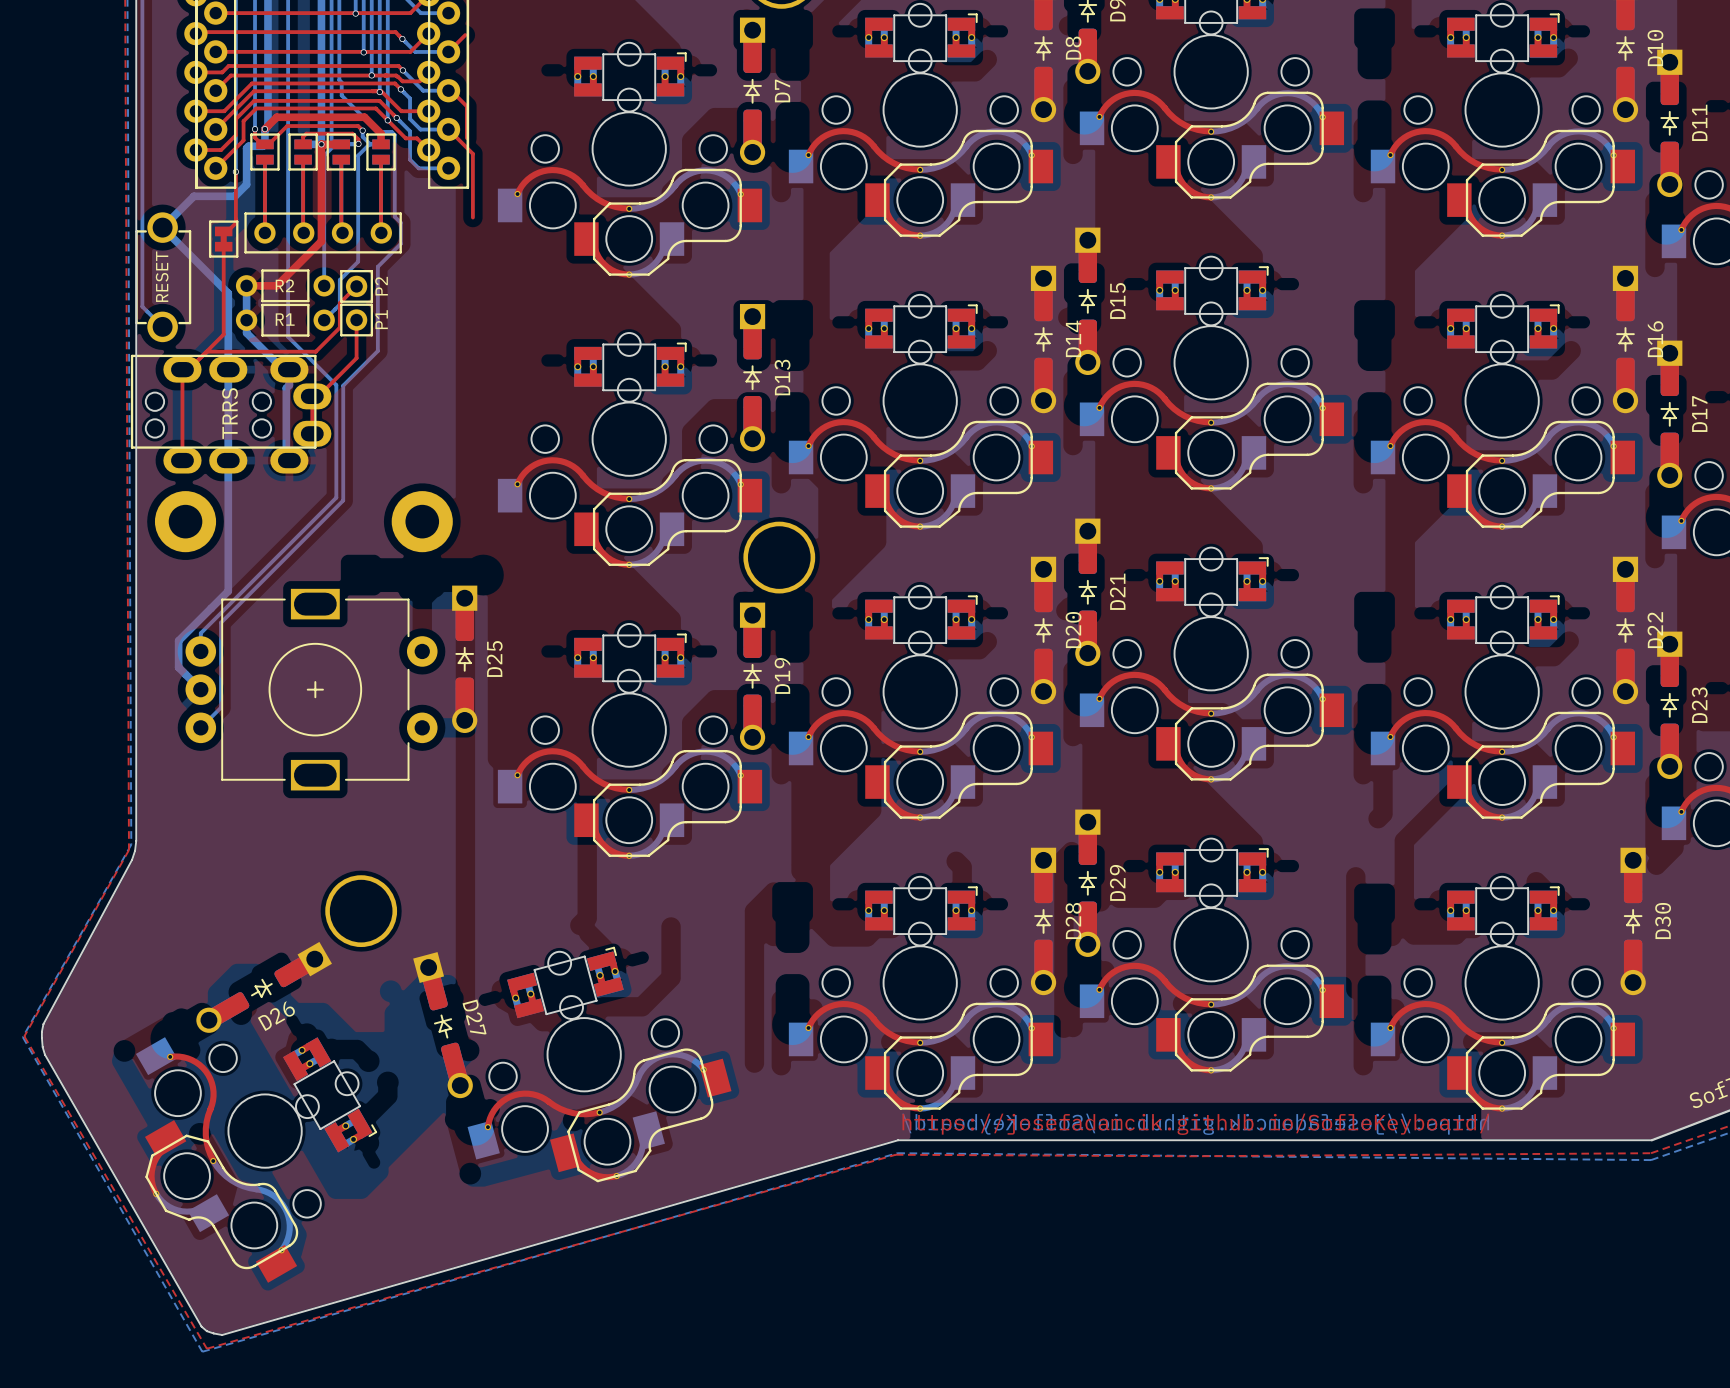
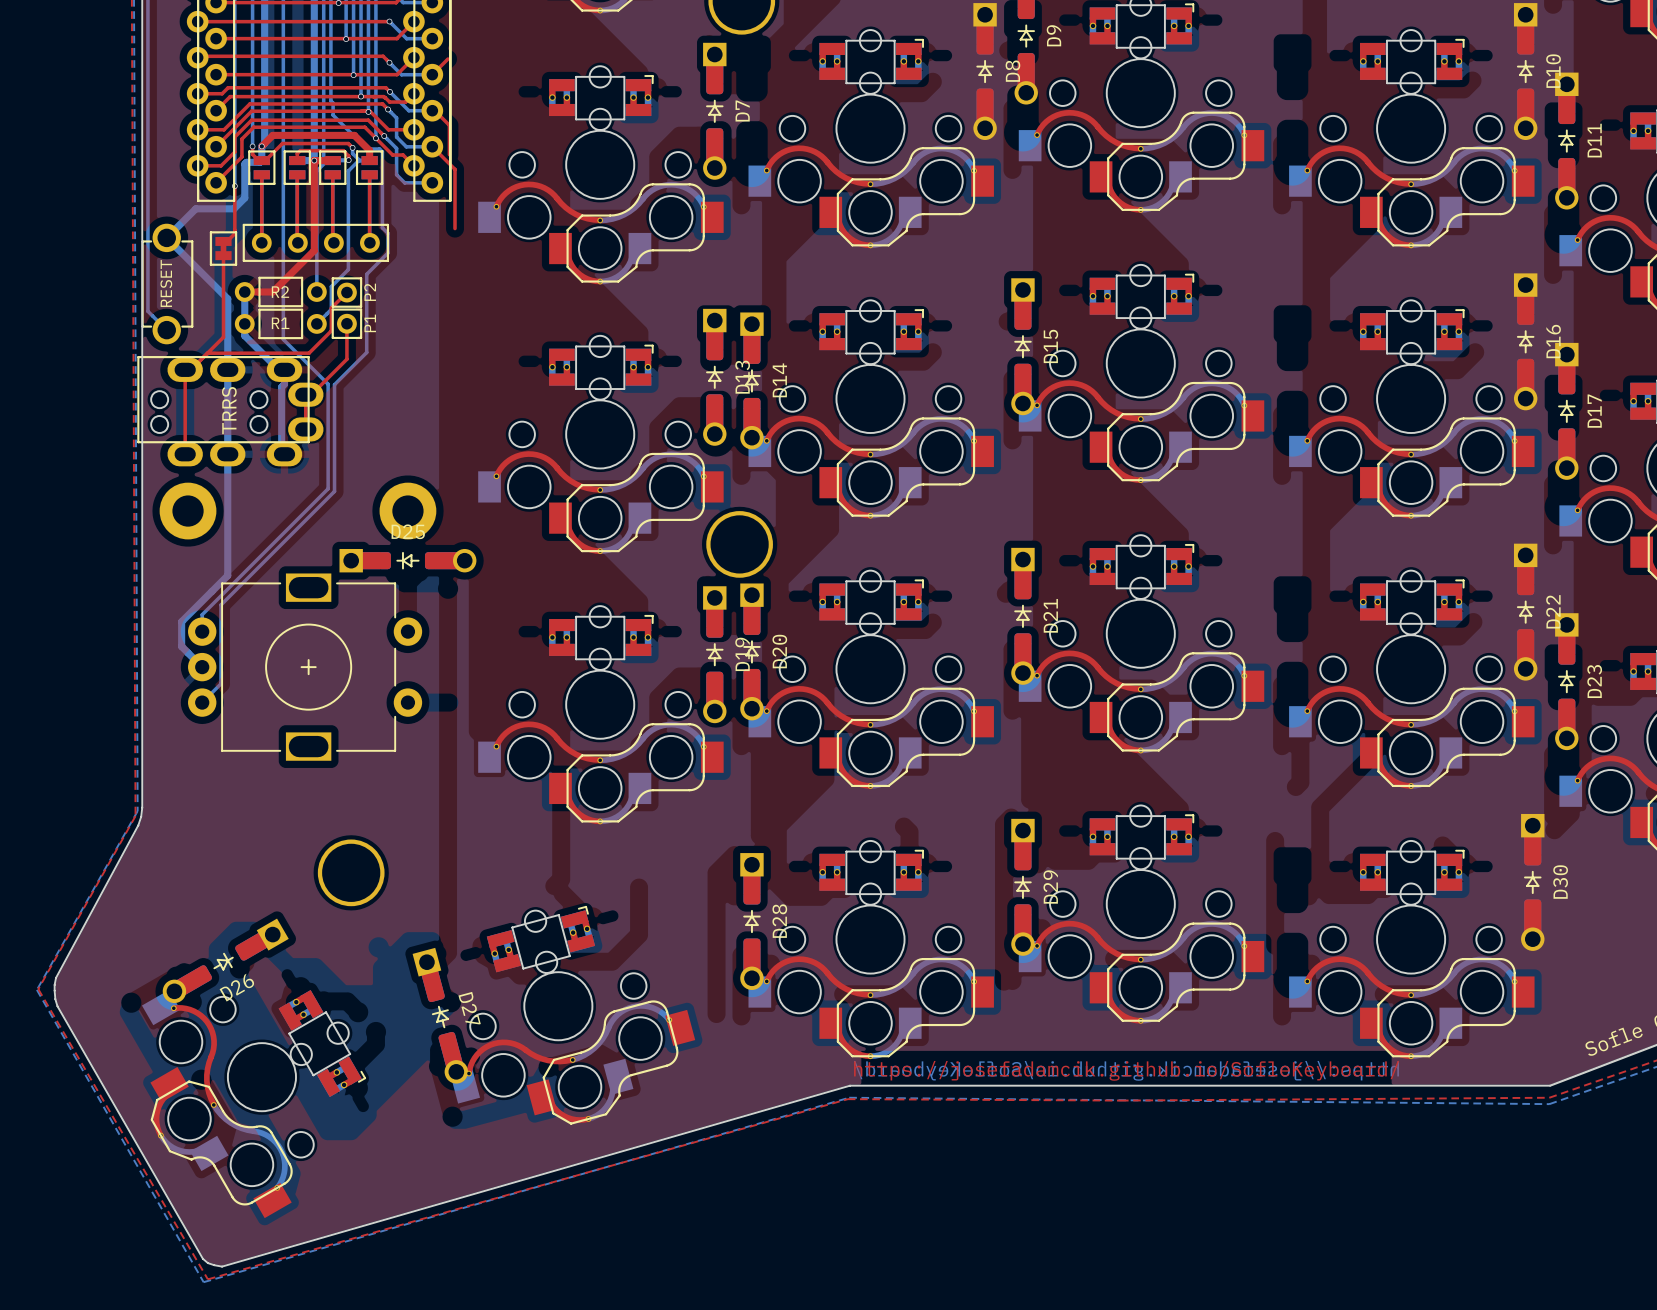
D15 position: (1087, 301) -> (1022, 346)
D14 position: (1043, 339) -> (751, 380)
D21 position: (1087, 592) -> (1022, 616)
D20 position: (1043, 630) -> (751, 651)
D25 rotation: 0° (464, 659) -> 90° counterclockwise (407, 560)
D25 position: (464, 659) -> (407, 560)
D29 position: (1087, 883) -> (1022, 887)
D28 position: (1043, 921) -> (751, 921)
D26 position: (264, 987) -> (225, 960)
D27 position: (443, 1025) -> (440, 1015)

